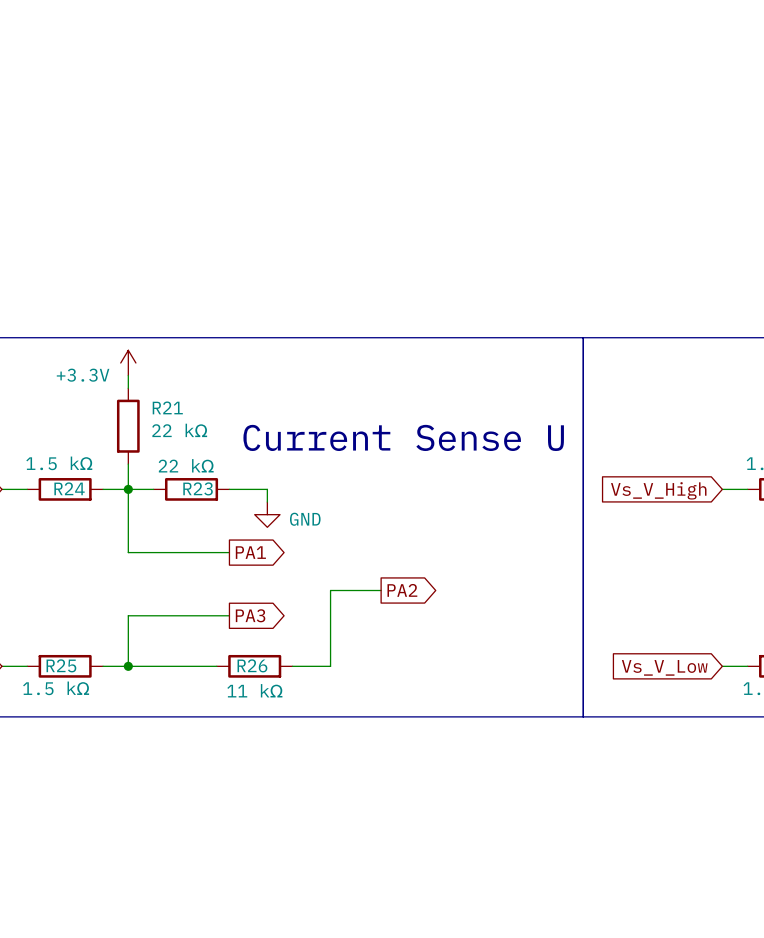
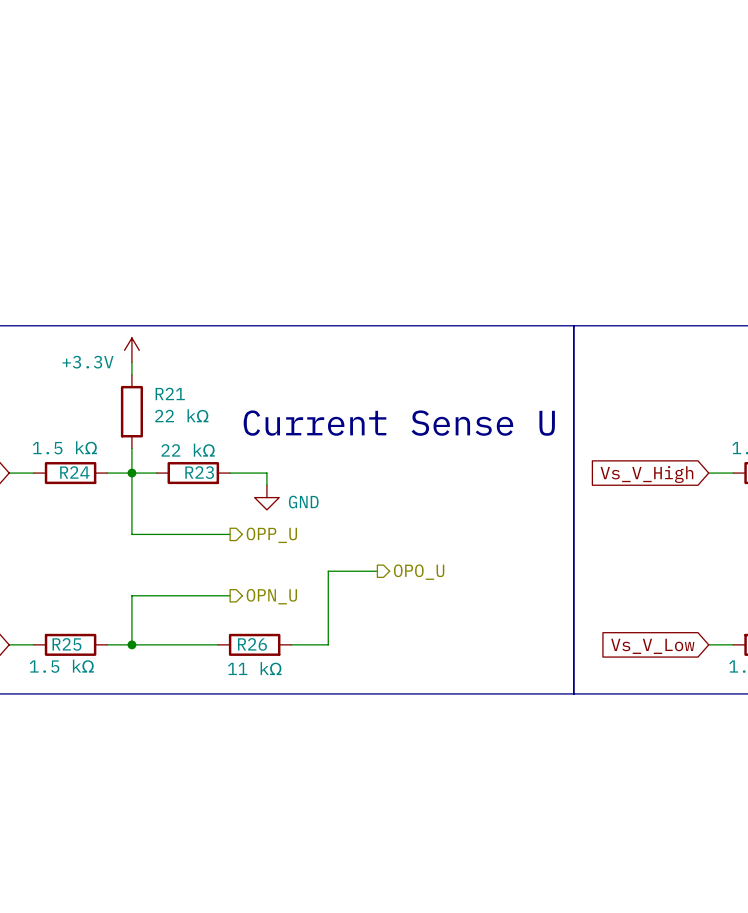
global label: PA1 (250, 552) -> none
hierarchical label: none -> OPP_U (271, 535)
global label: PA2 (402, 590) -> none
hierarchical label: none -> OPO_U (419, 572)
global label: PA3 (250, 615) -> none
hierarchical label: none -> OPN_U (271, 596)

